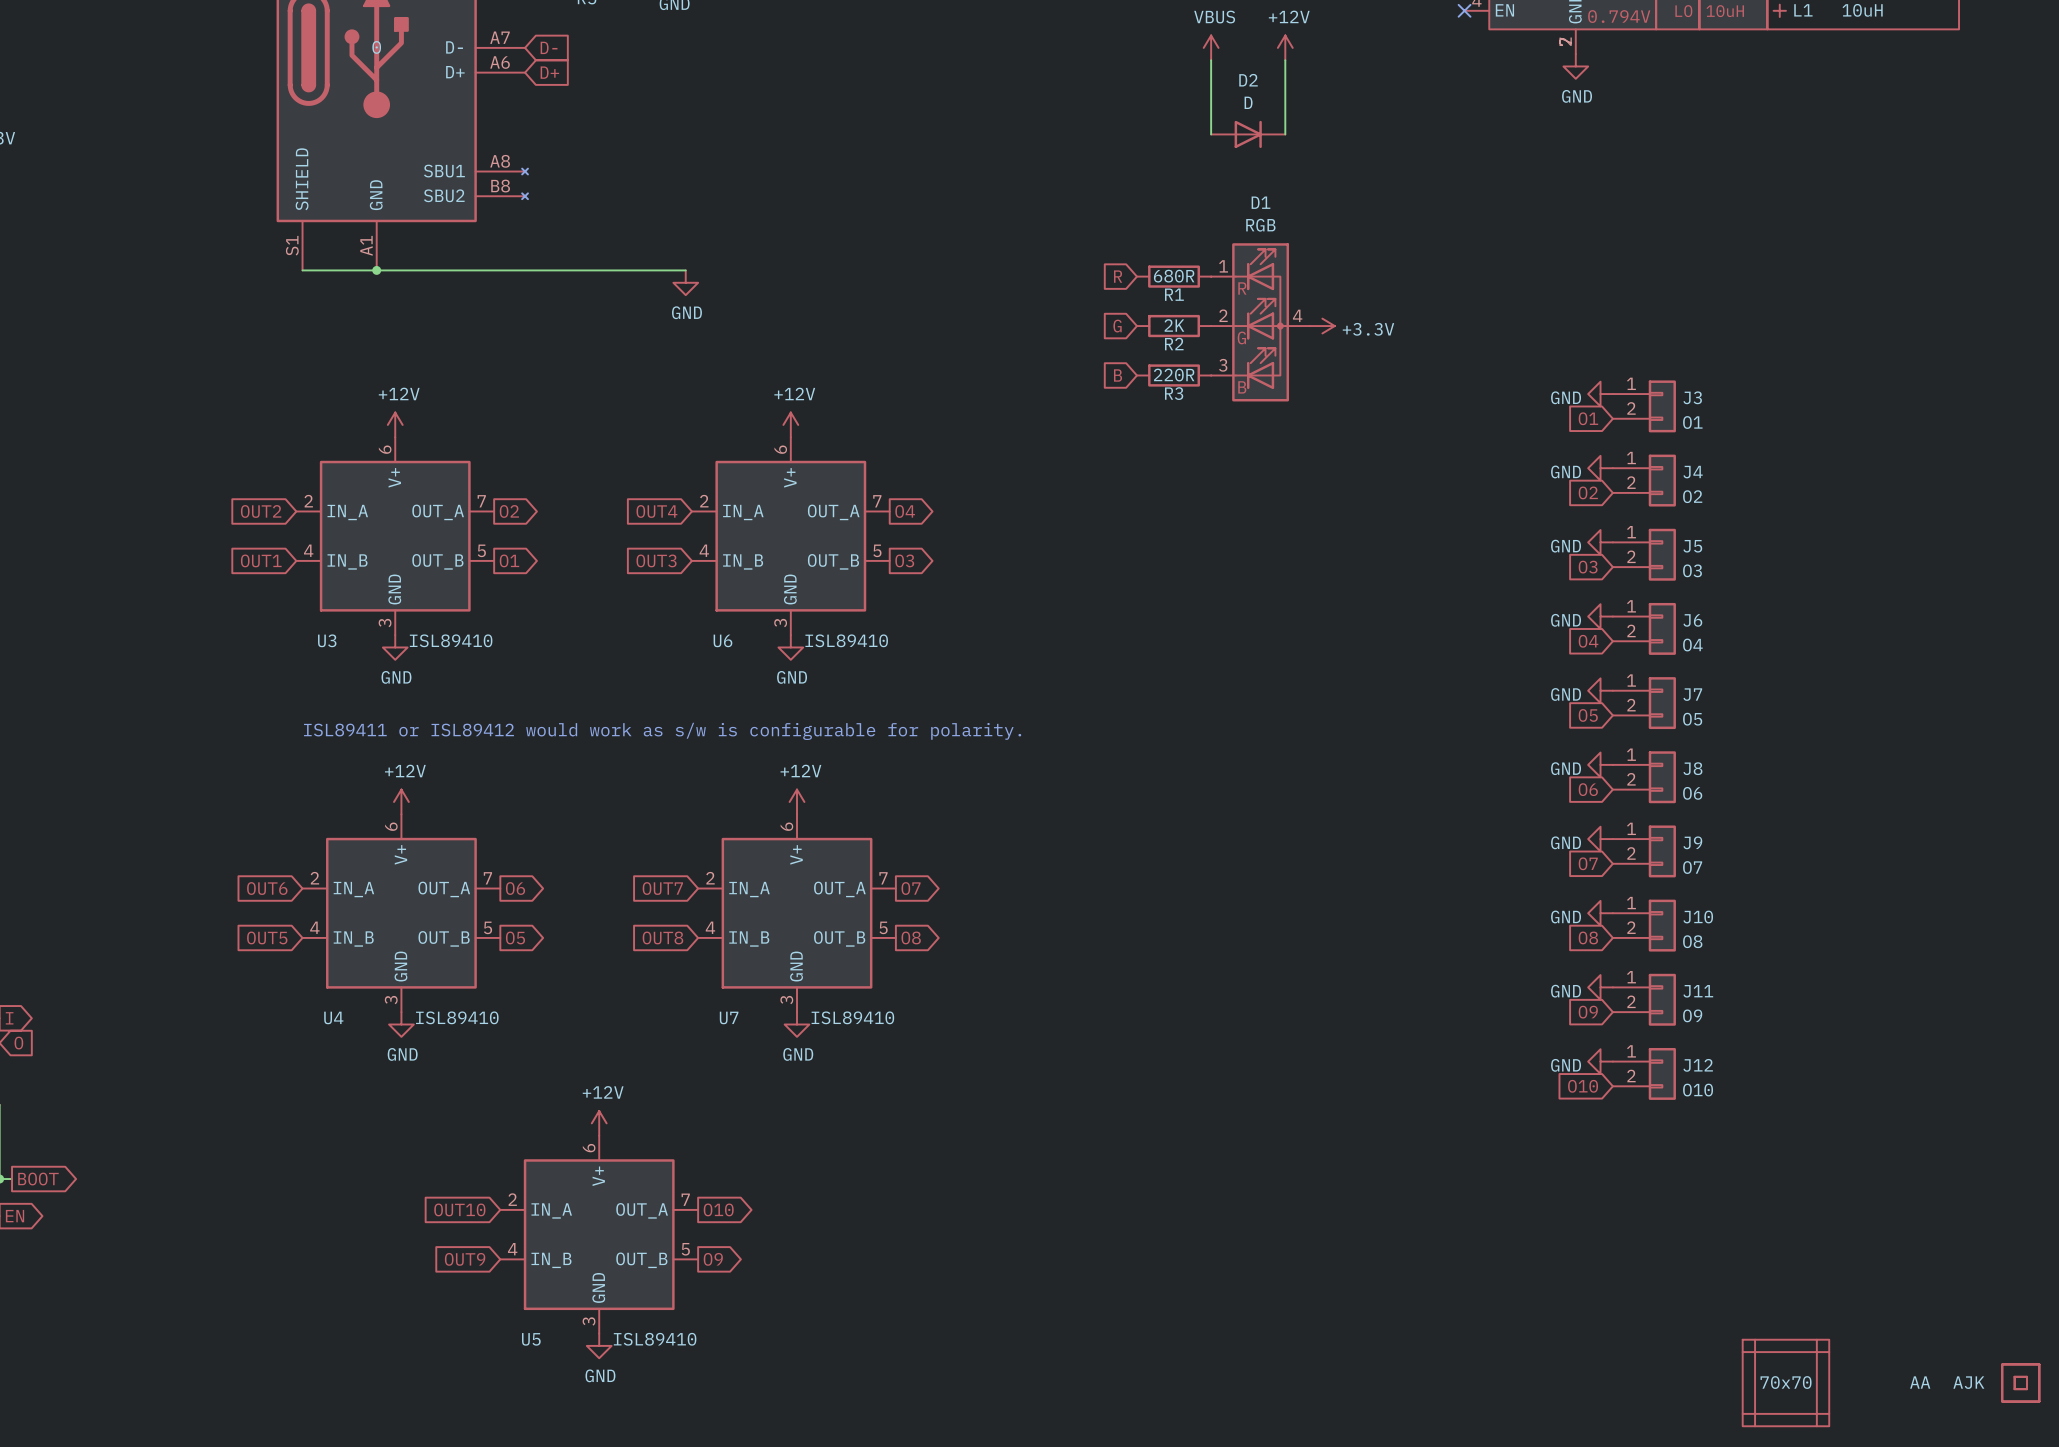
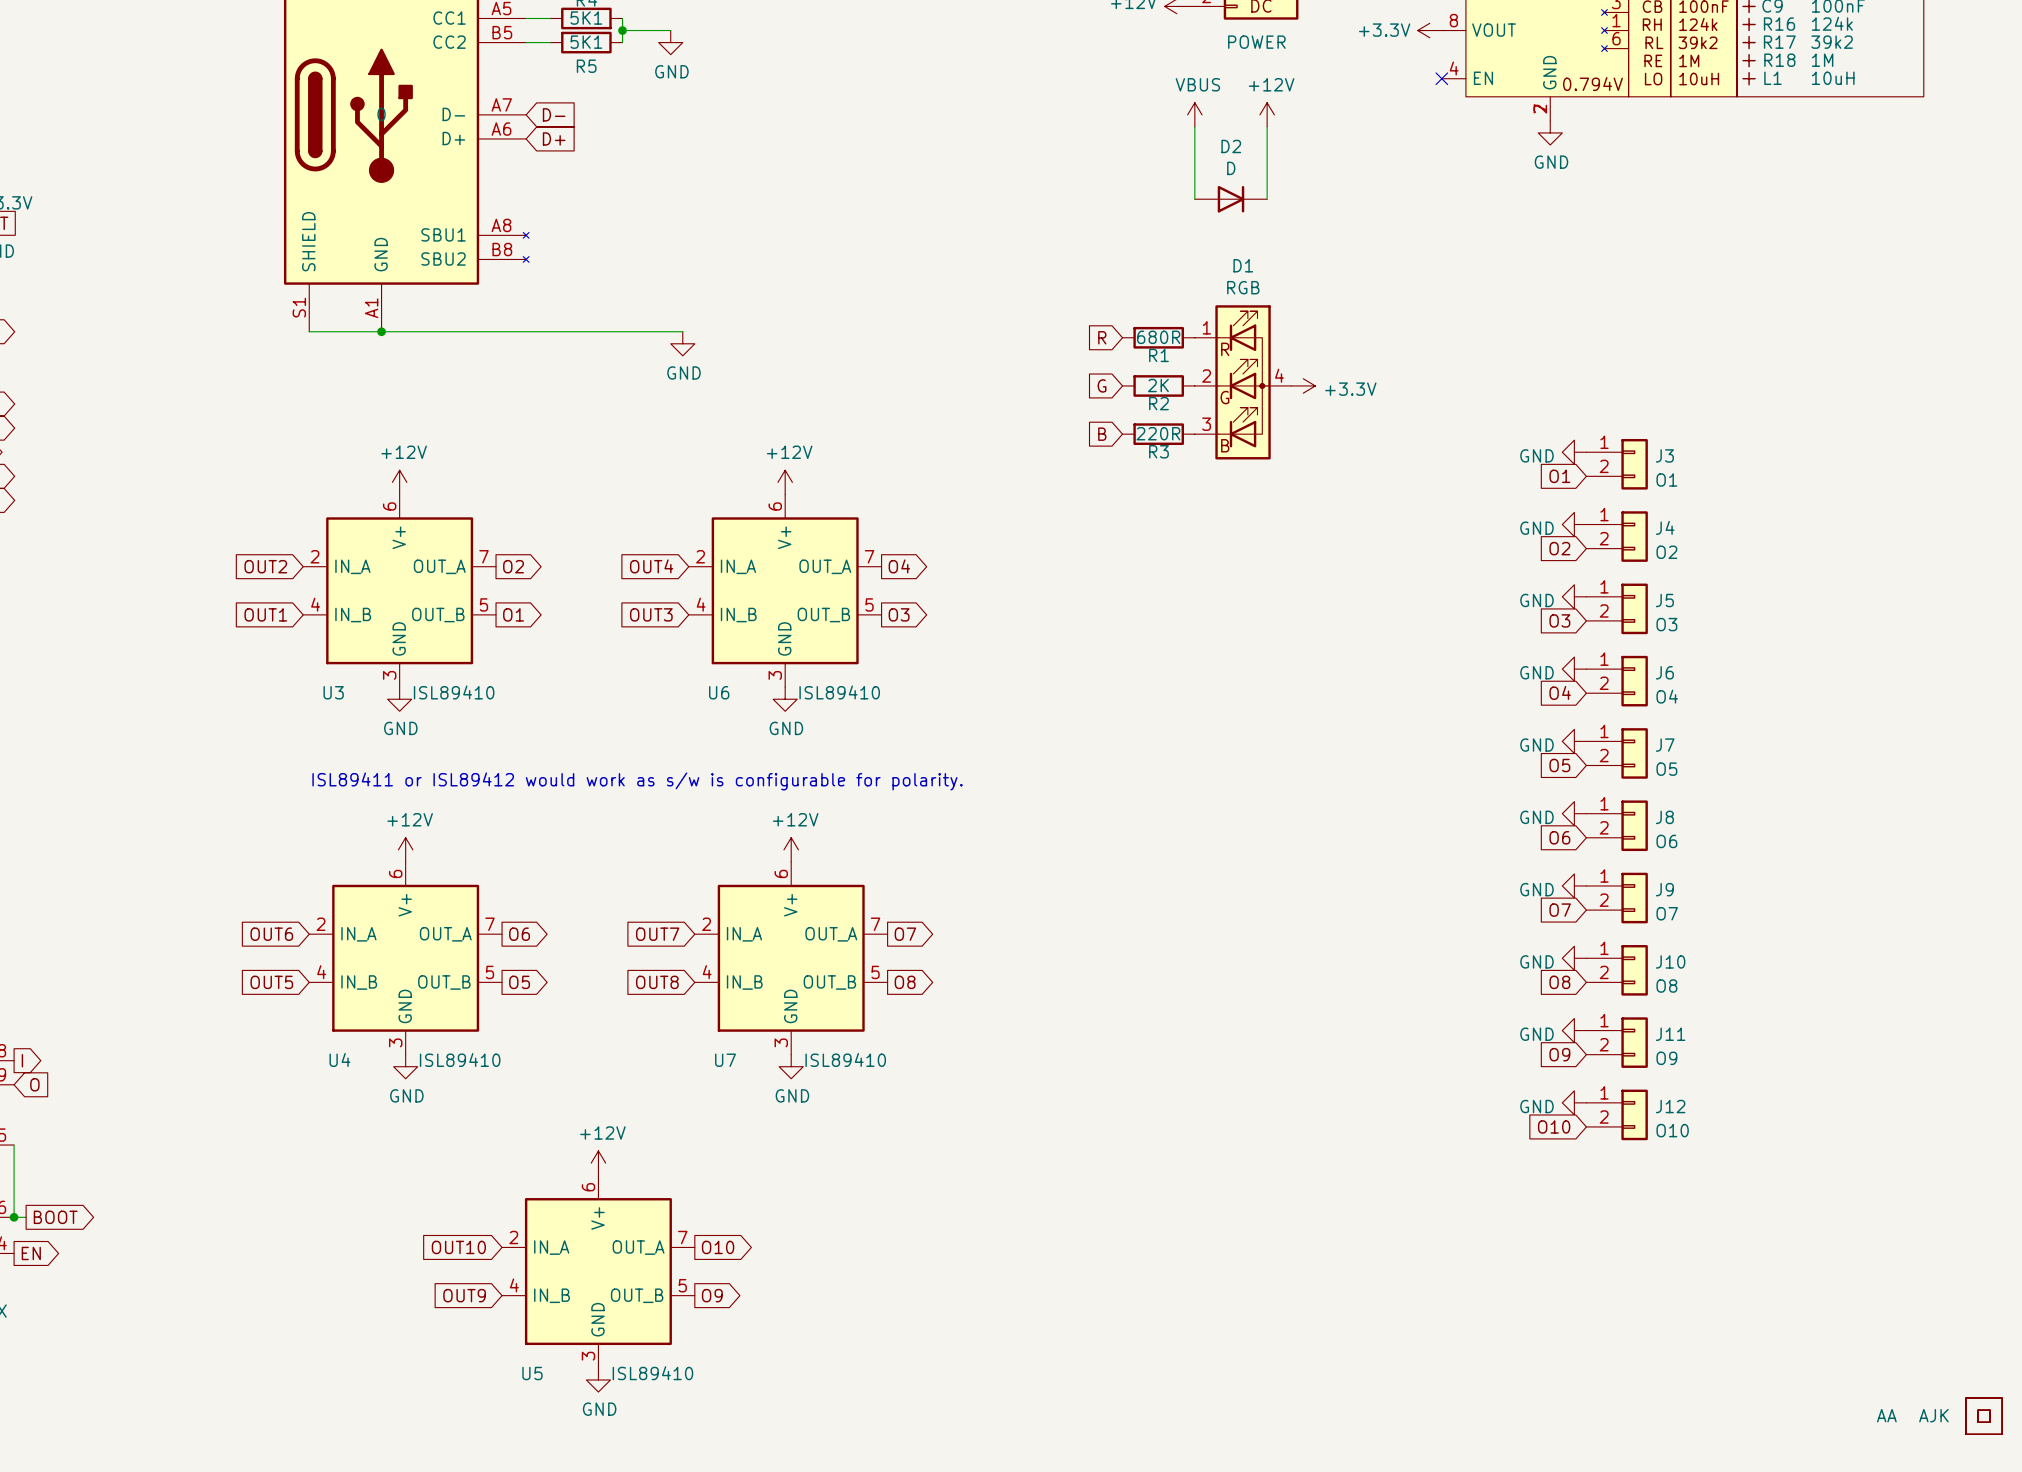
part: (1785, 1352) -> none
part: (1755, 1382) -> none
part: 70x70 (1785, 1382) -> none
part: (1816, 1382) -> none
part: (1785, 1413) -> none

